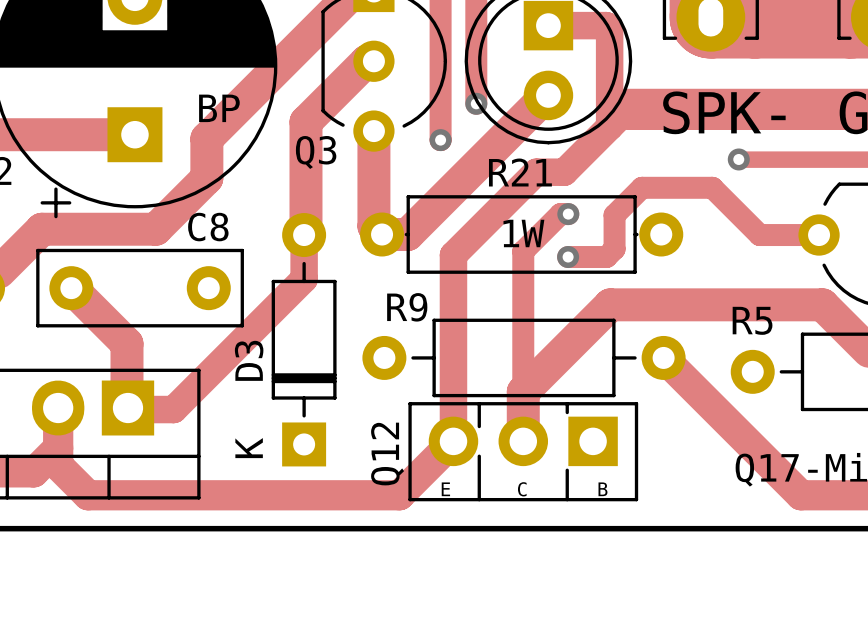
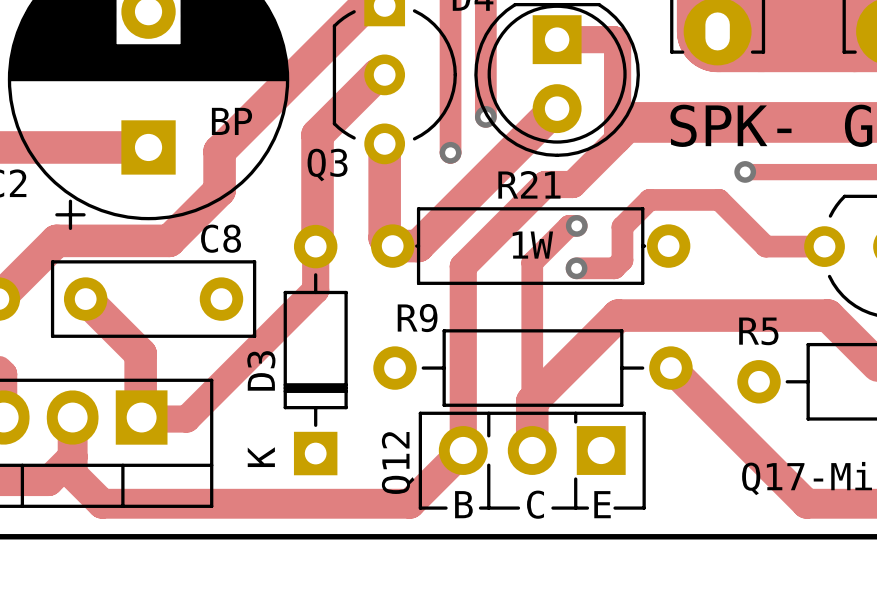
Q12 footprint: [408, 402, 639, 502] -> [418, 411, 646, 510]
text: E (445, 489) -> none
text: C (522, 489) -> none
text: B (602, 489) -> none

